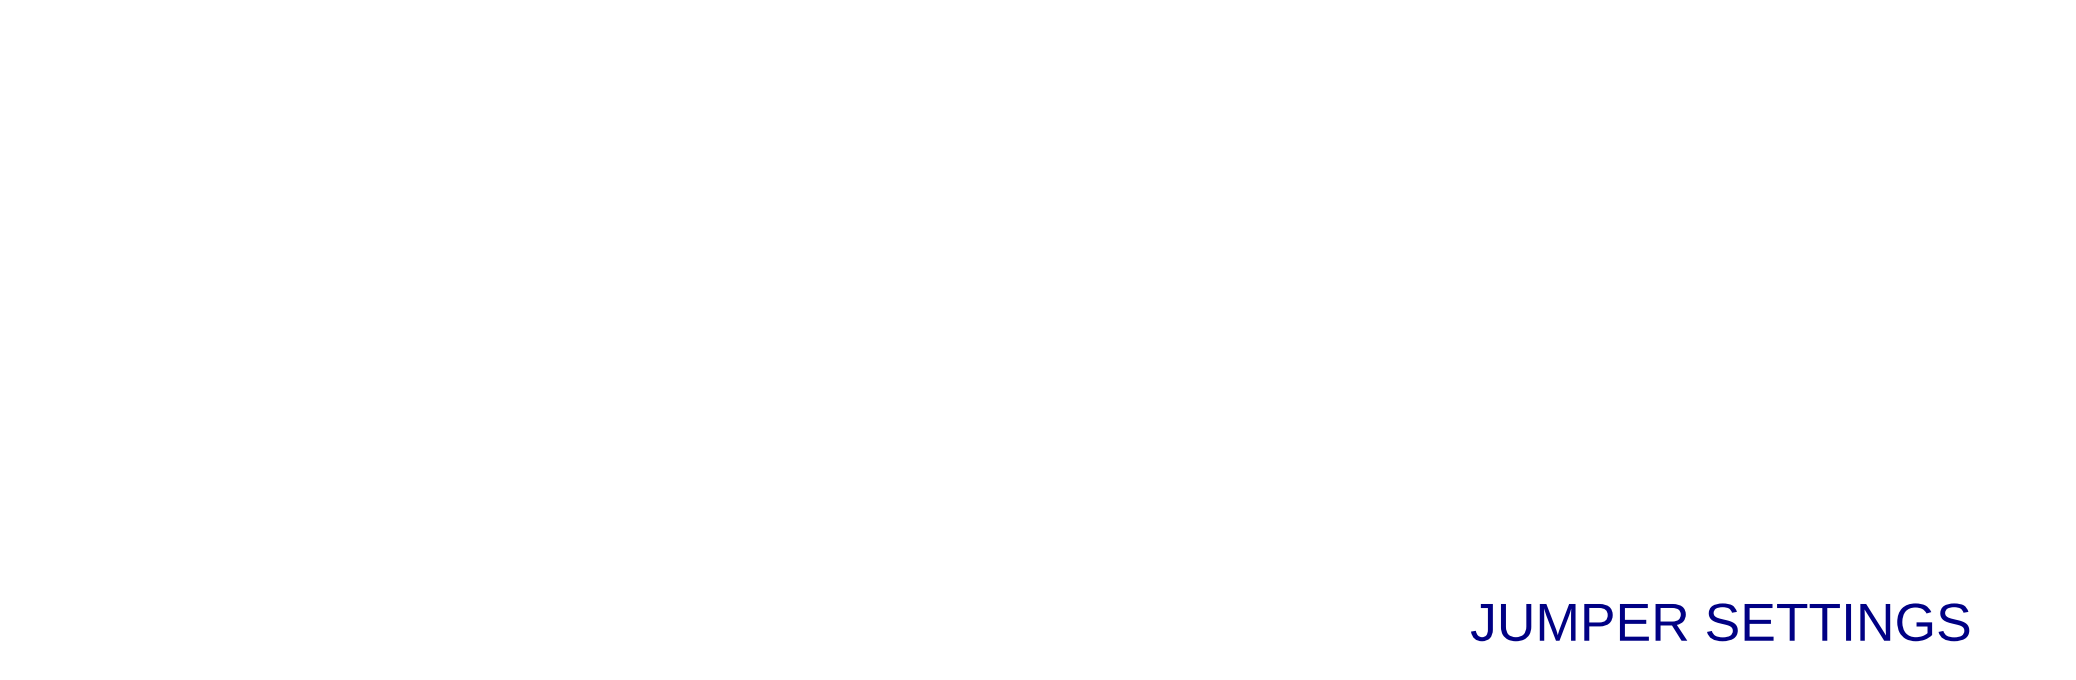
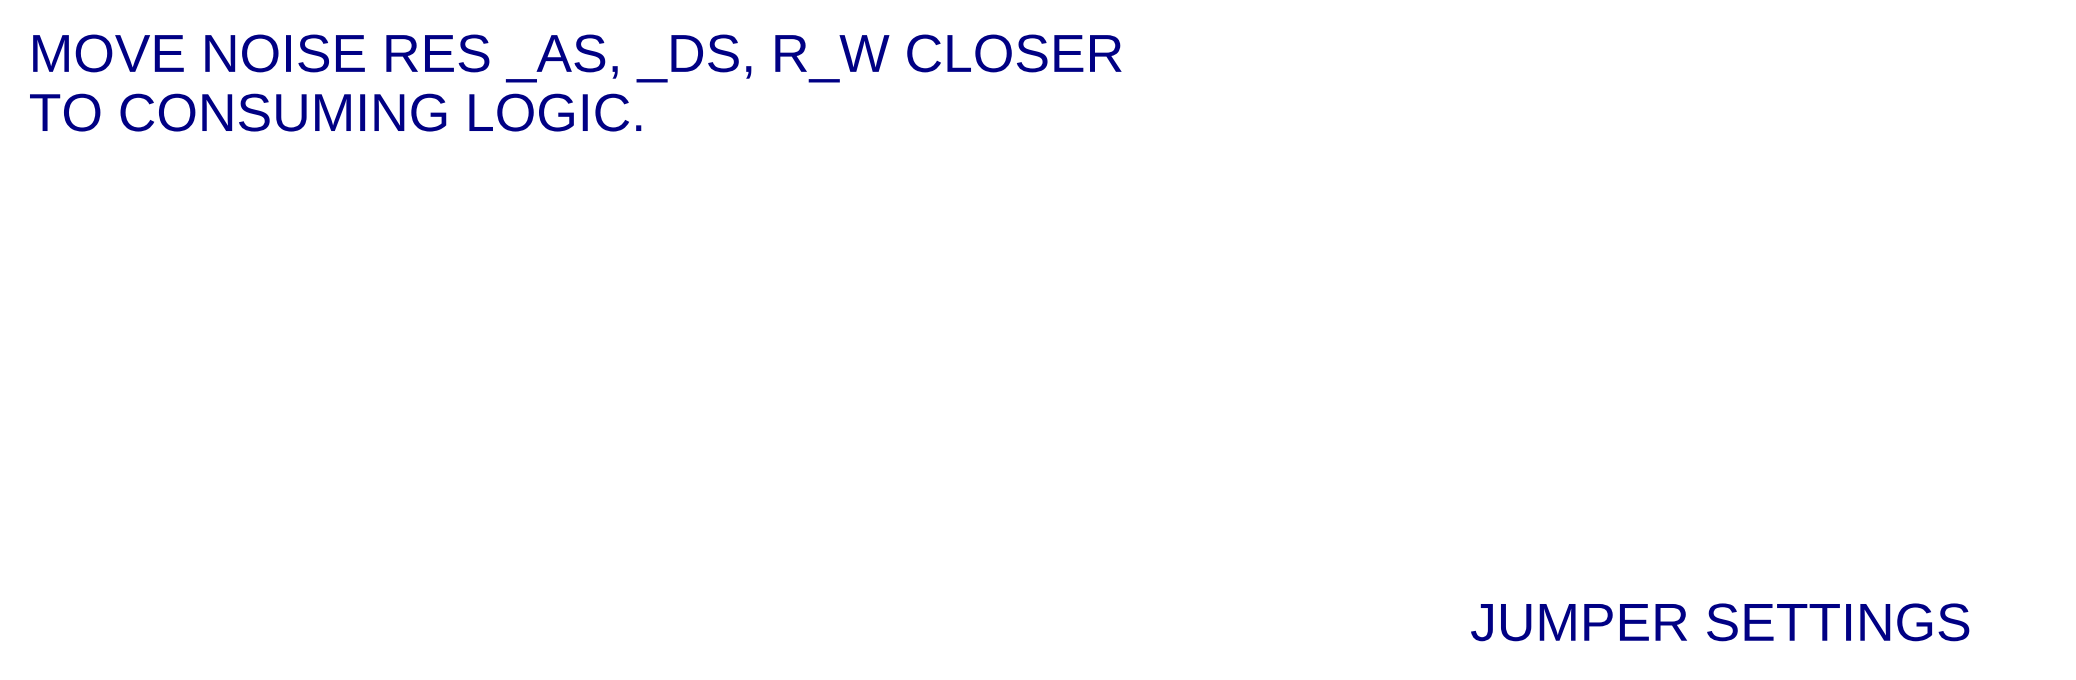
text: none -> MOVE NOISE RES _AS, _DS, R_W CLOSER (577, 58)
text: none -> TO CONSUMING LOGIC. (335, 112)

